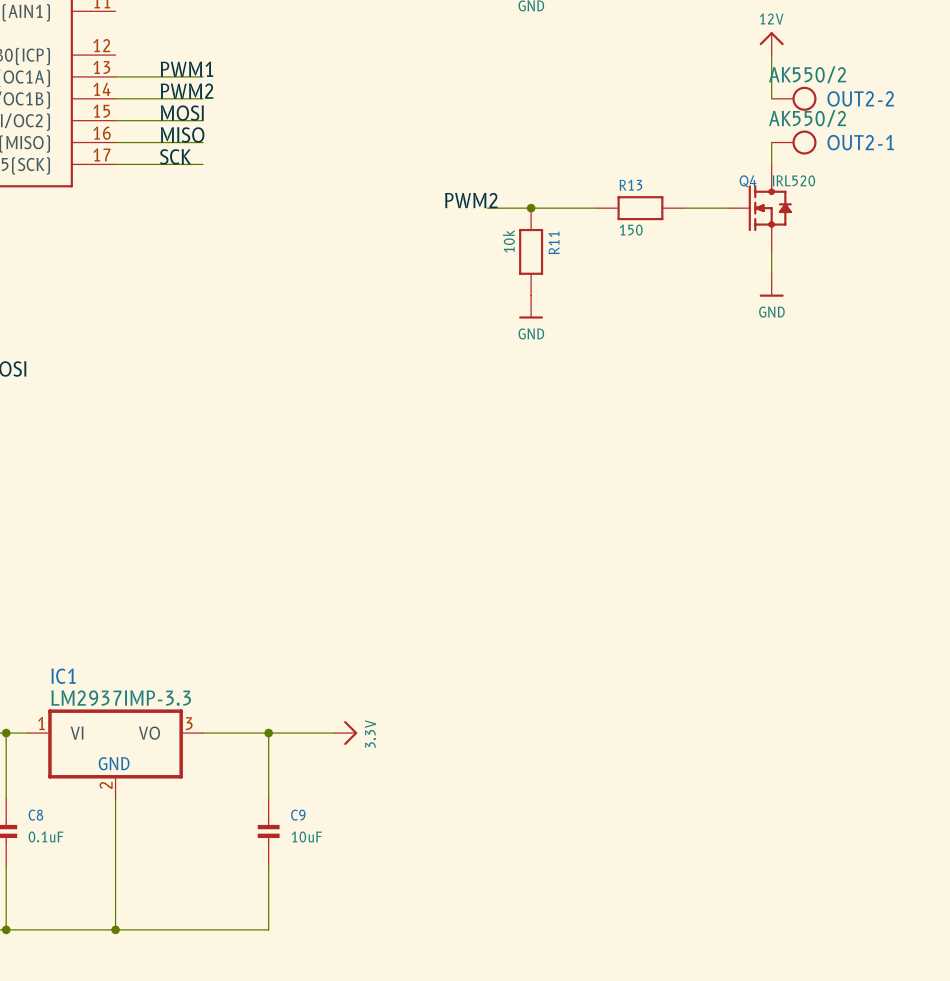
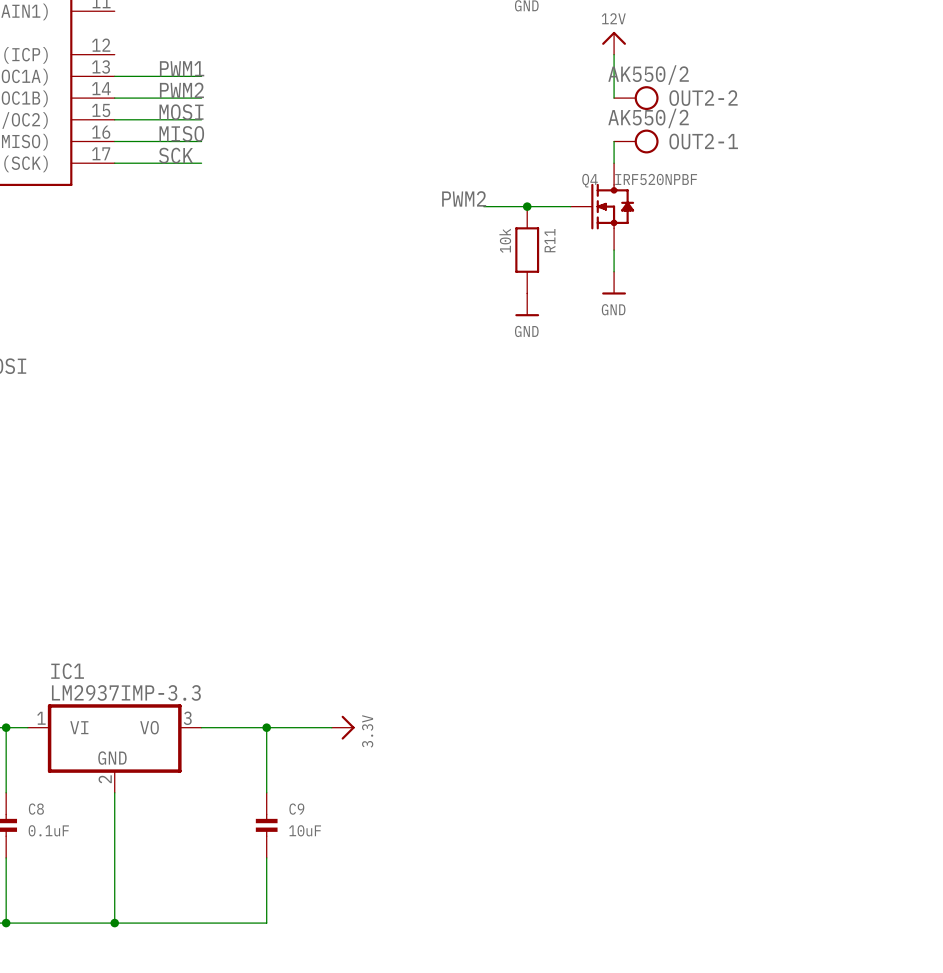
power symbol position: 12V (771, 43) -> 12V (614, 43)
wire: (771, 55) (771, 98) -> (614, 54) (614, 98)
OUT2-2 position: (794, 98) -> (636, 98)
wire: (771, 142) (771, 164) -> (614, 141) (614, 163)
OUT2-1 position: (794, 142) -> (636, 141)
Q4 value: IRL520 (793, 180) -> IRF520NPBF (656, 179)
R13: 150 (640, 208) -> none
wire: (684, 208) (727, 208) -> none
Q4 position: (759, 208) -> (602, 206)
wire: (771, 251) (771, 273) -> (614, 250) (614, 271)
power symbol position: GND (771, 285) -> GND (614, 283)

